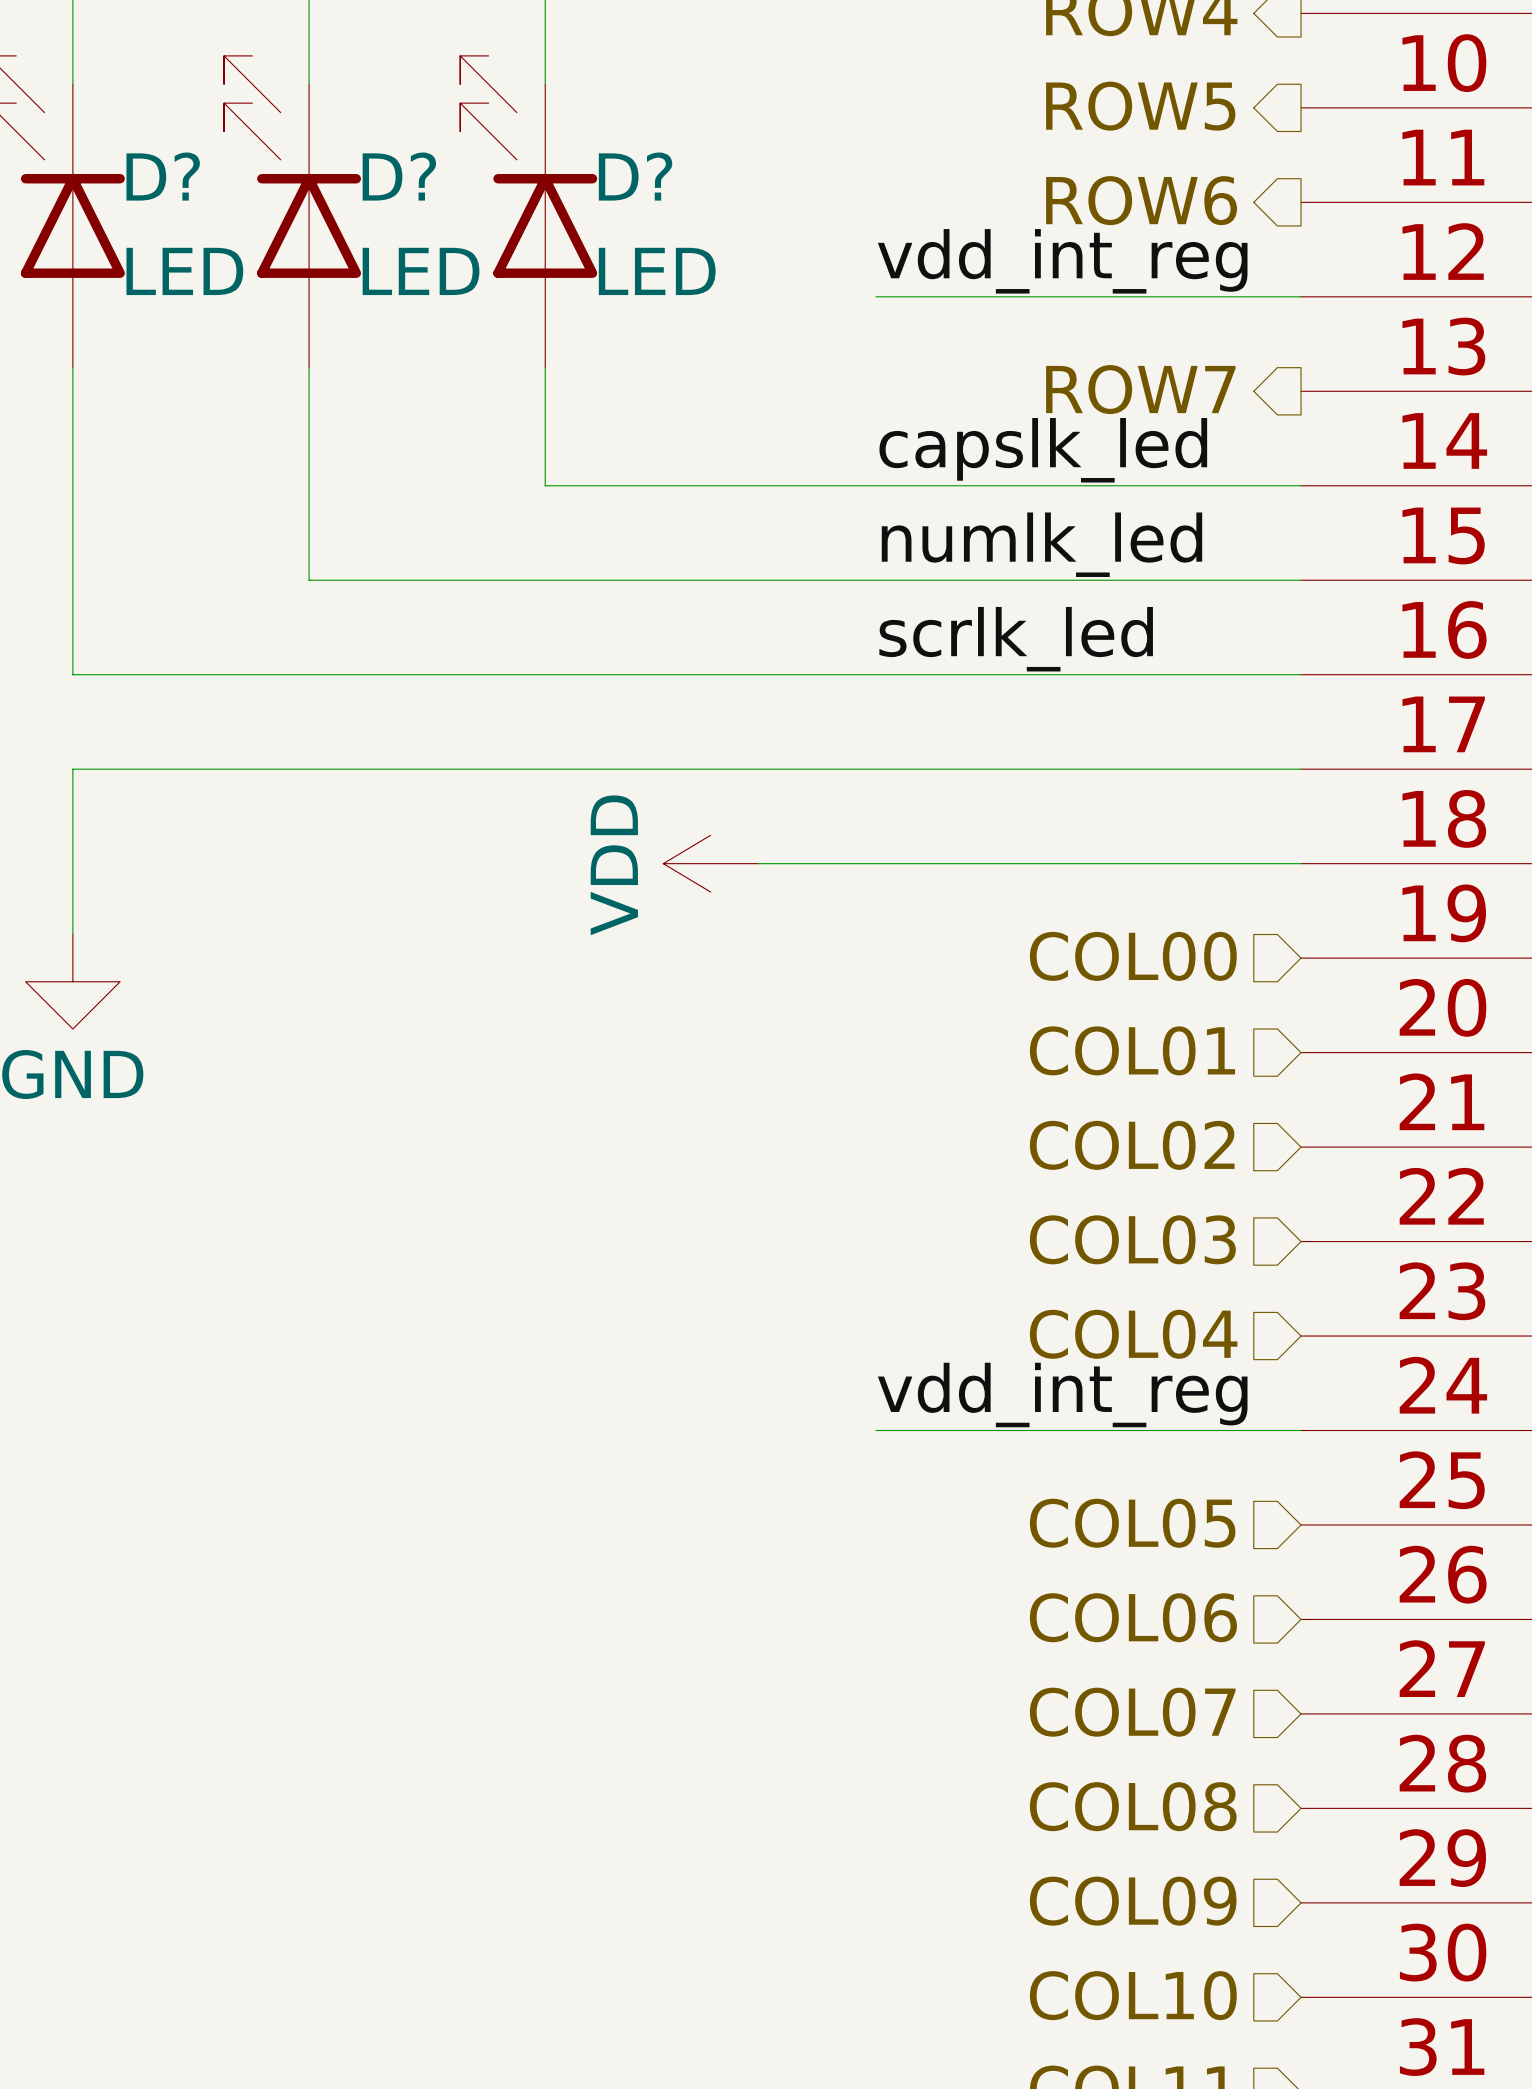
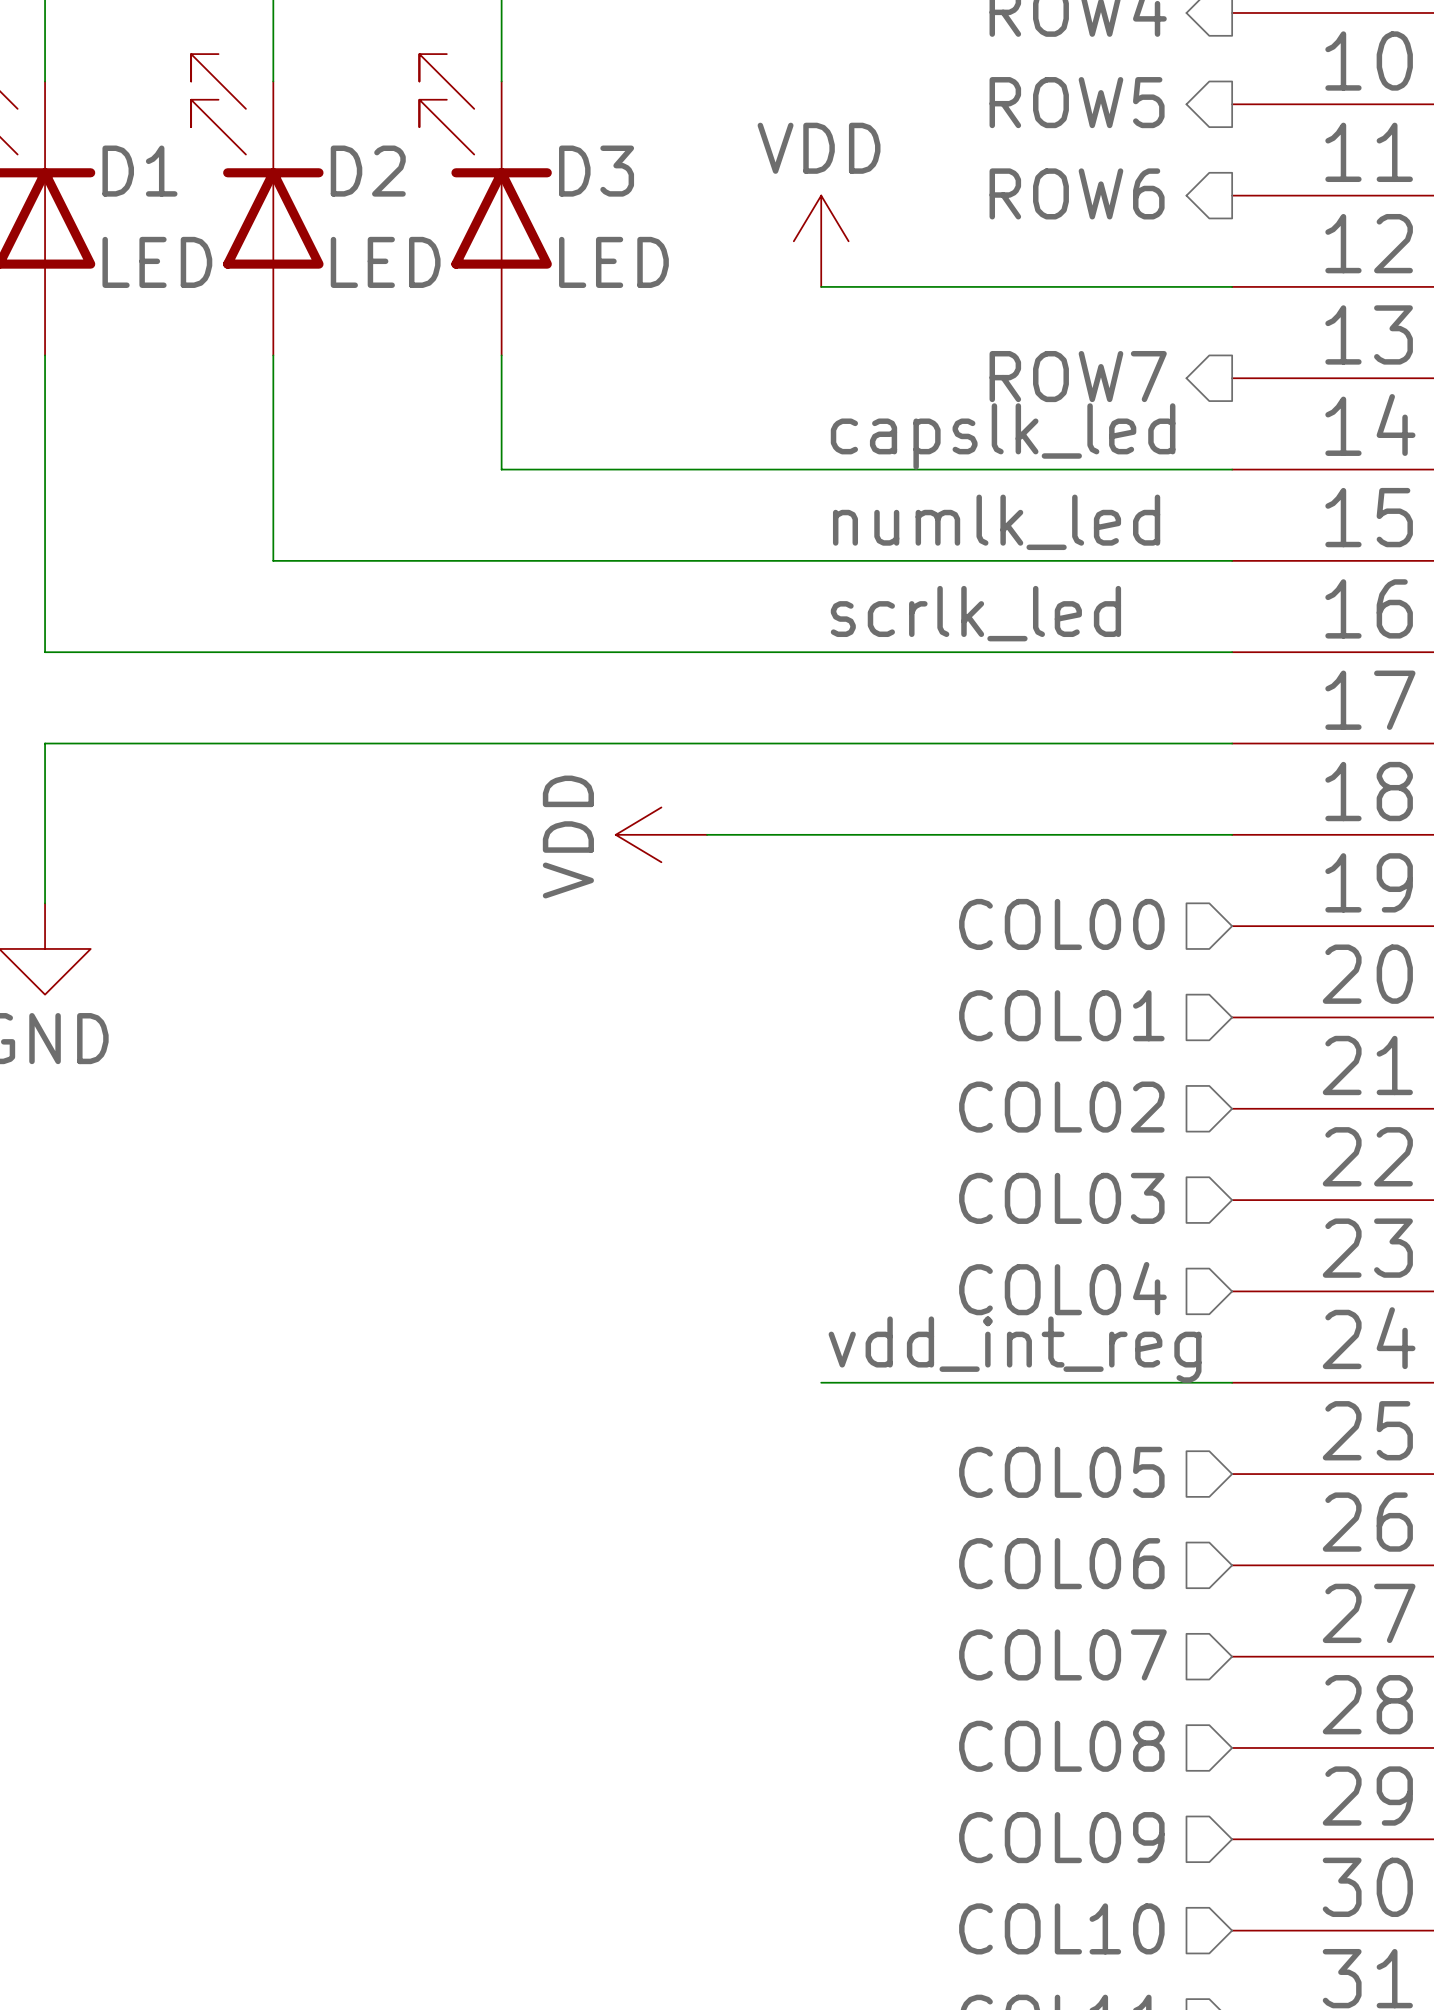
D? name: D? (163, 176) -> D1 (139, 171)
D? name: D? (399, 176) -> D2 (368, 171)
D? name: D? (635, 176) -> D3 (596, 171)
power symbol: none -> VDD (821, 241)
label: vdd_int_reg (1062, 261) -> none

